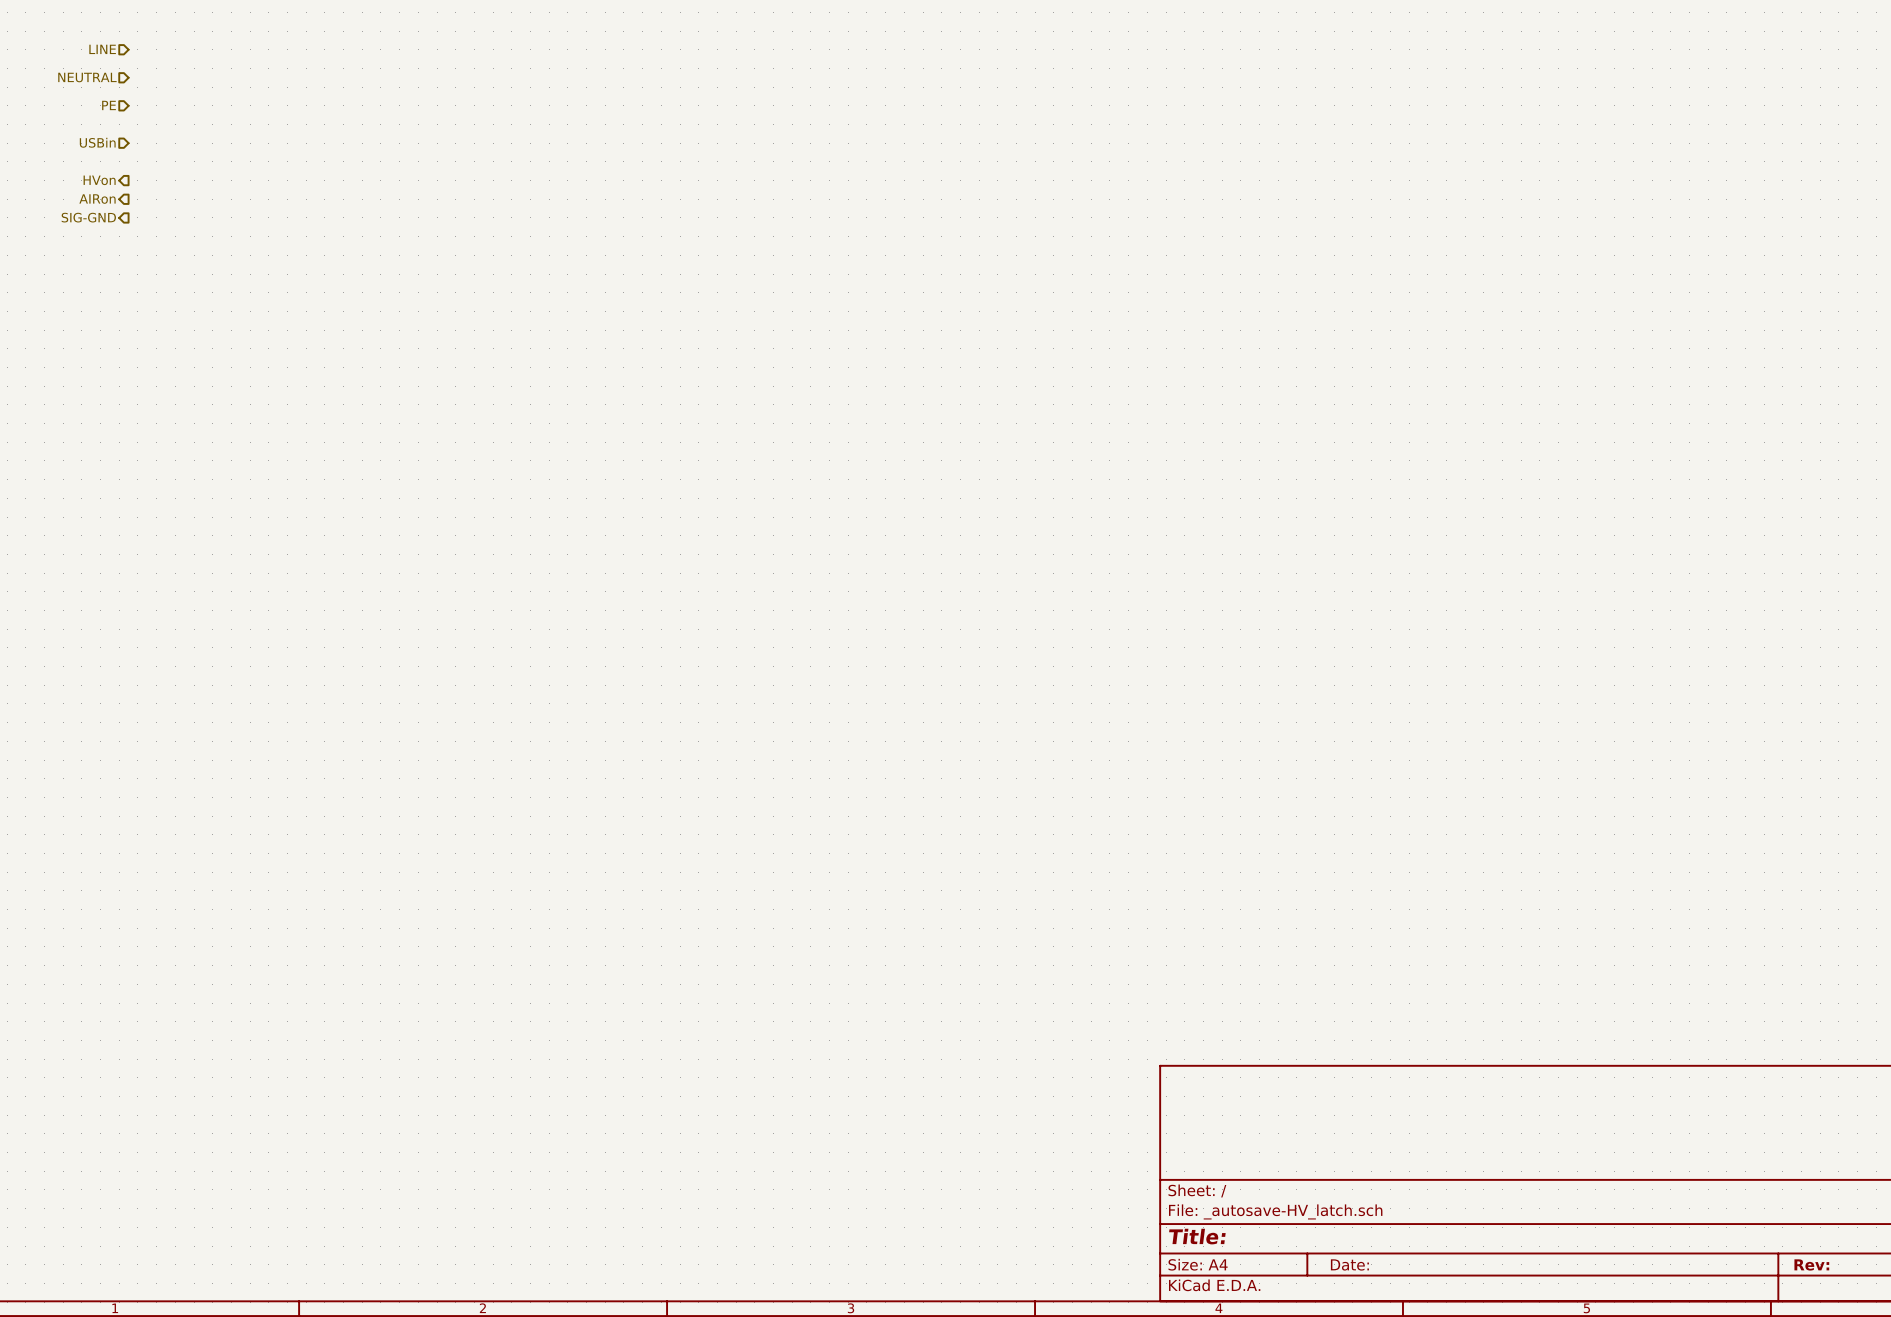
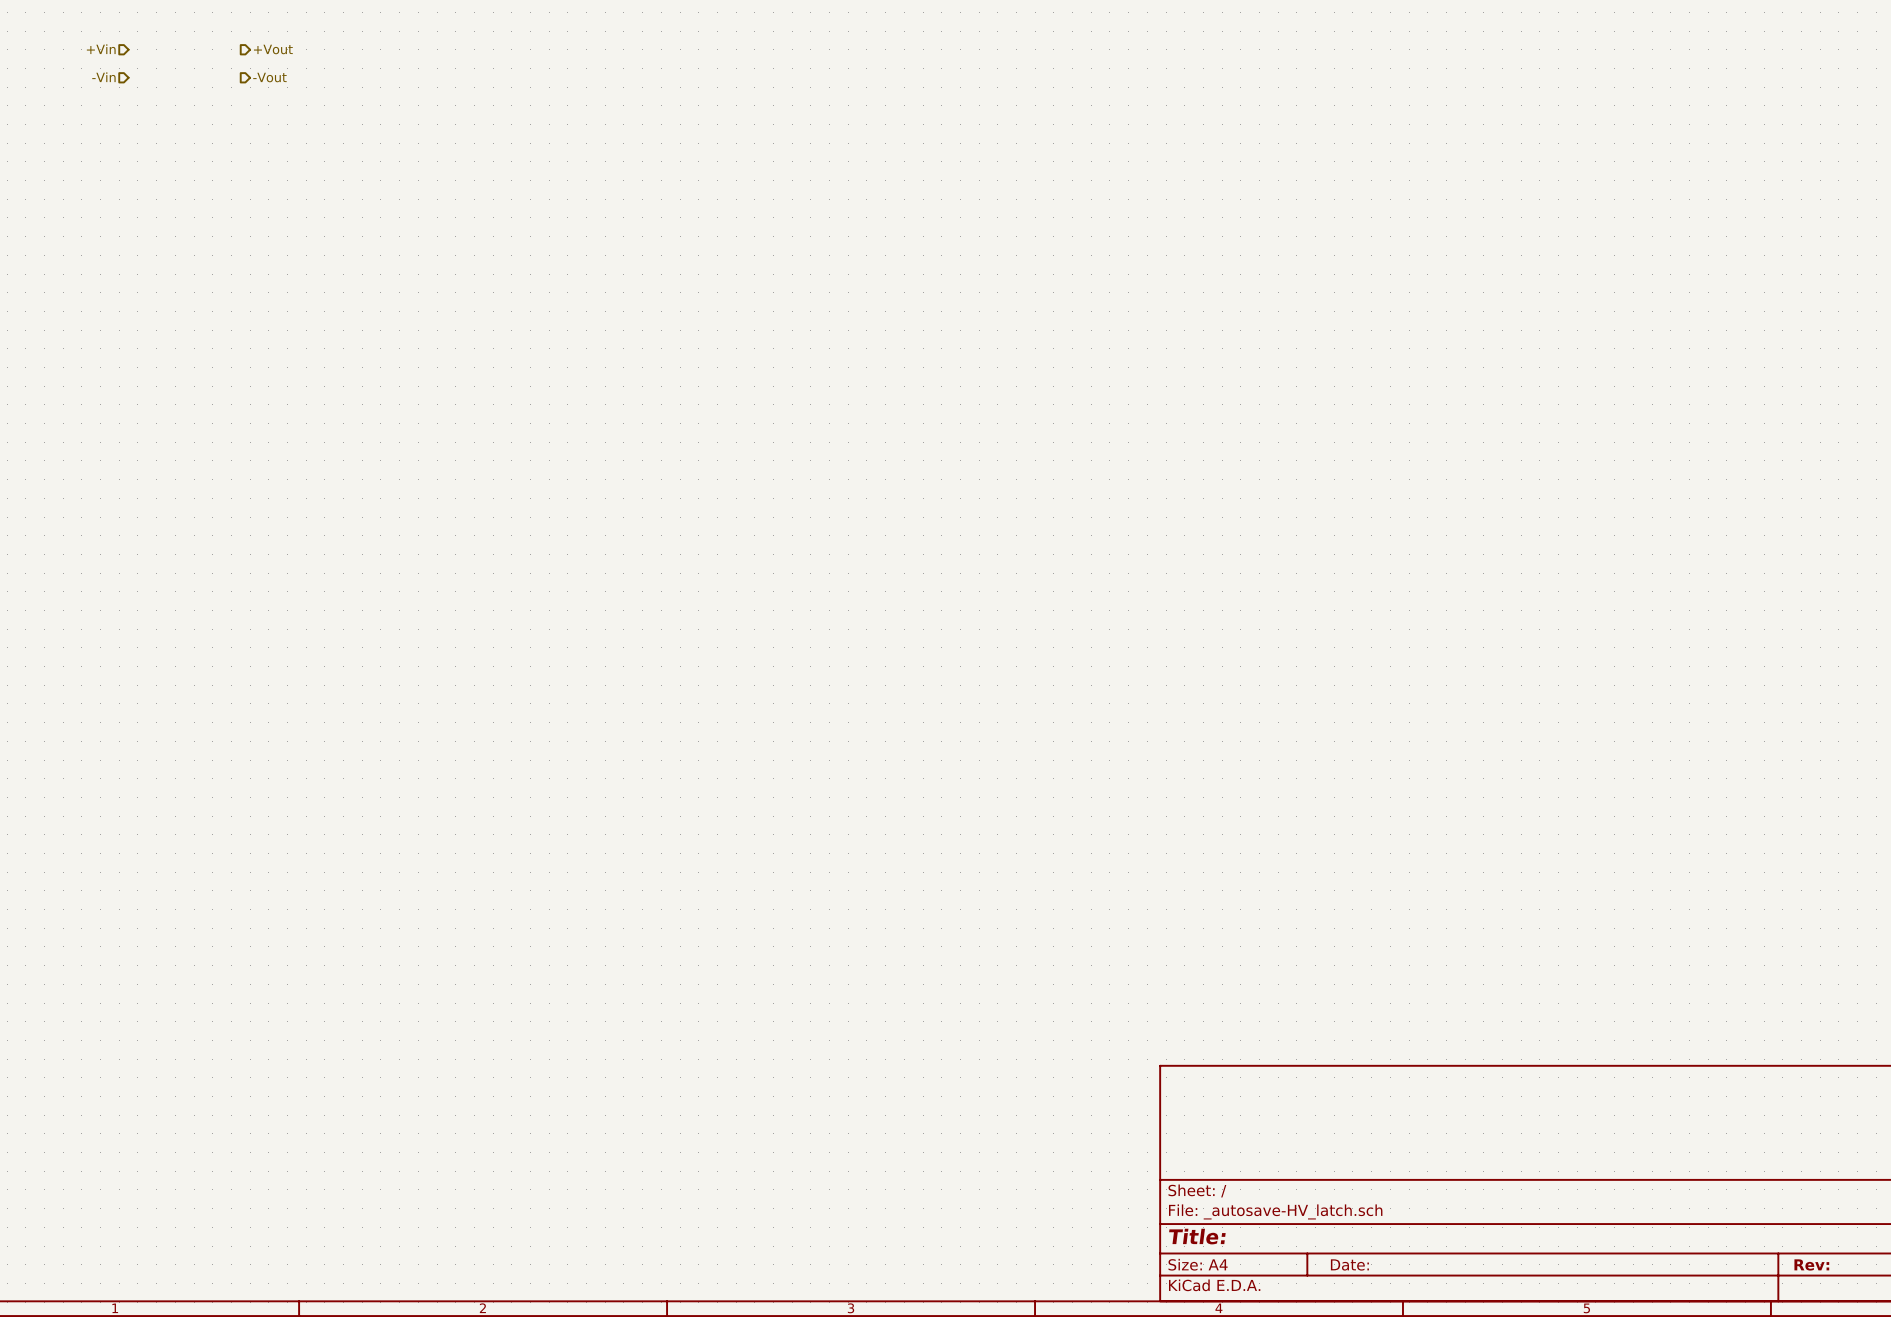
hierarchical label: LINE (102, 49) -> +Vin (101, 49)
hierarchical label: none -> +Vout (273, 49)
hierarchical label: NEUTRAL (87, 77) -> -Vin (103, 77)
hierarchical label: none -> -Vout (269, 77)
hierarchical label: PE (109, 105) -> none
hierarchical label: USBin (97, 142) -> none
hierarchical label: HVon (99, 180) -> none
hierarchical label: AIRon (97, 199) -> none
hierarchical label: SIG-GND (88, 217) -> none

